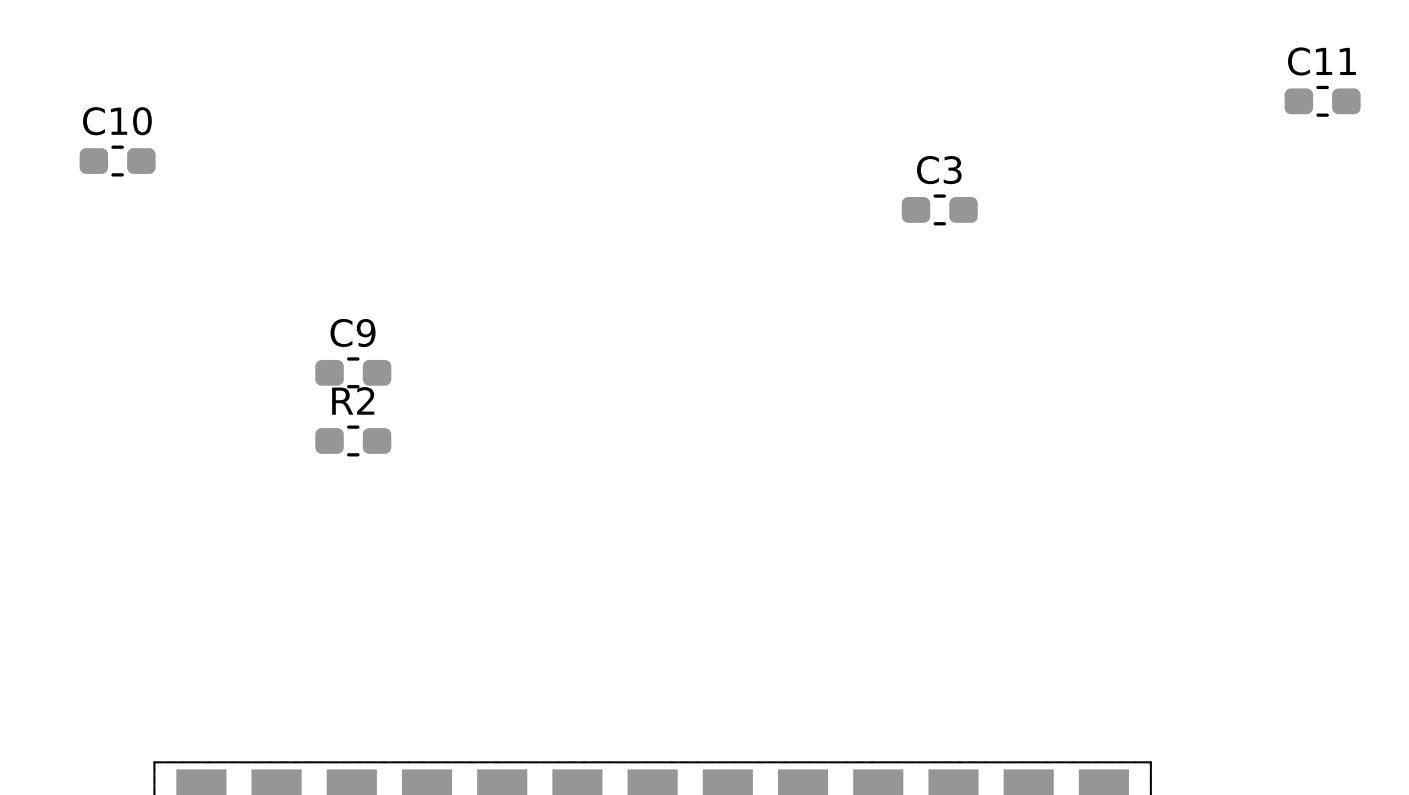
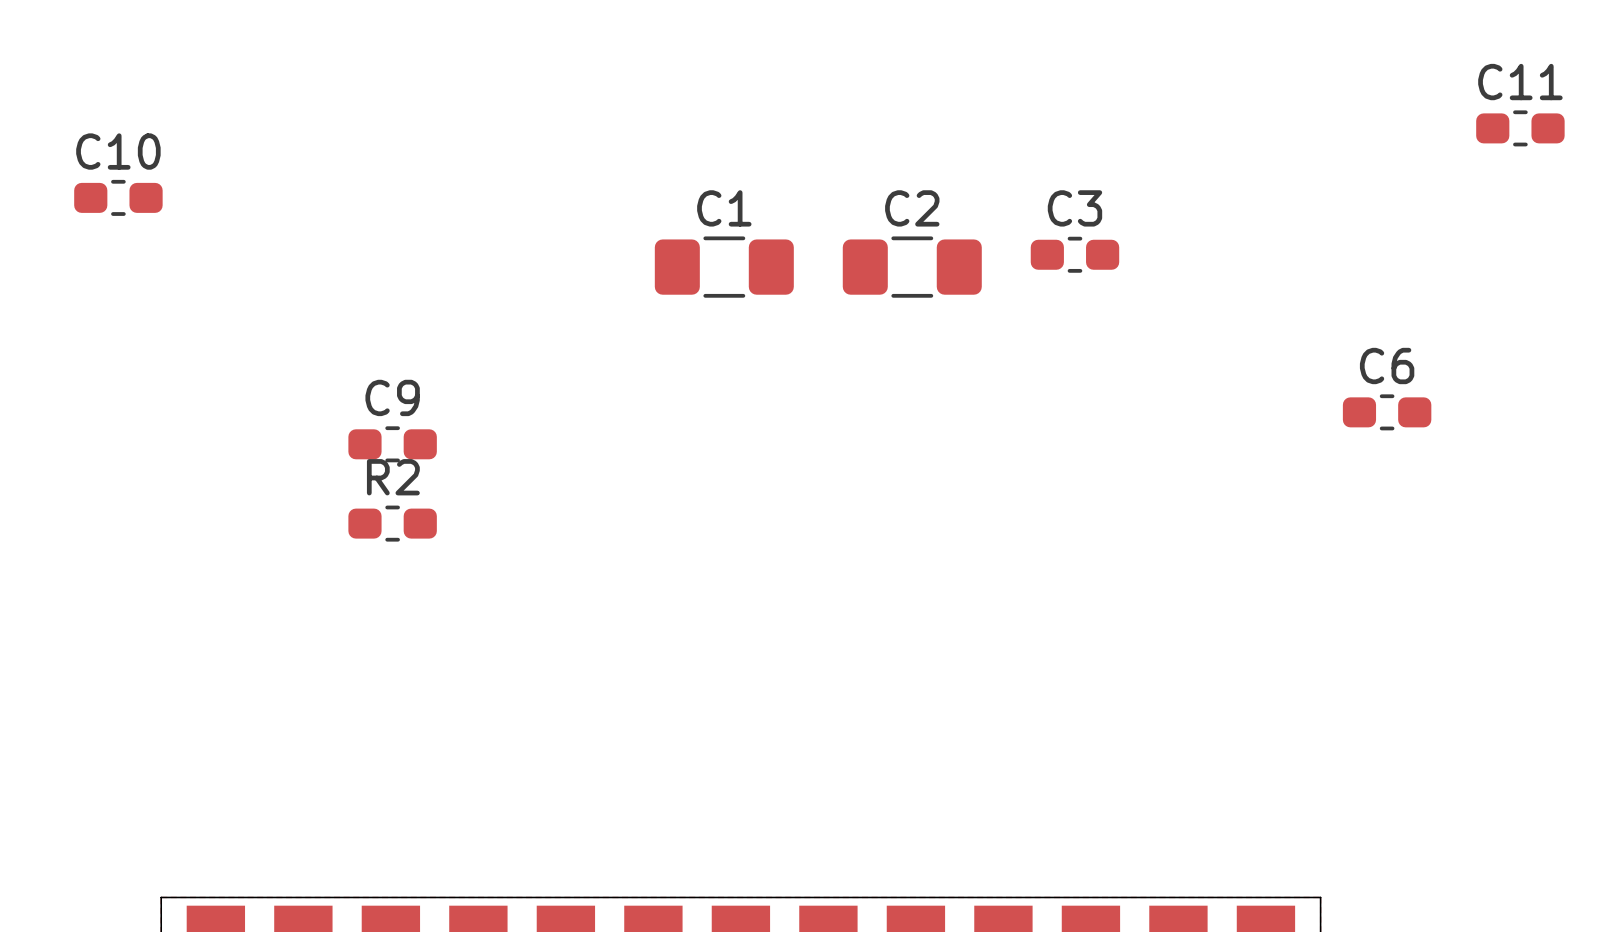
C1: none -> (724, 267)
C2: none -> (912, 267)
C6: none -> (1387, 412)

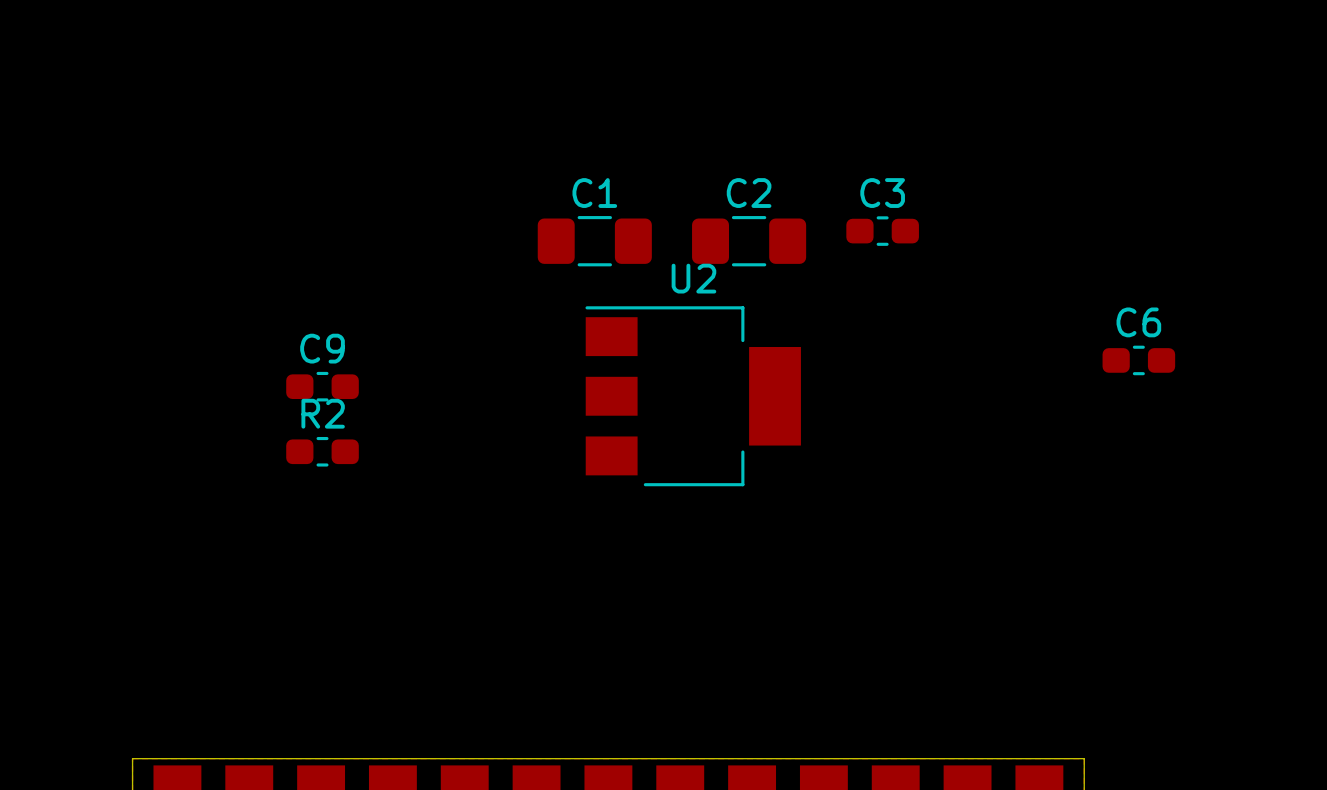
C11: (1520, 128) -> none
C10: (118, 197) -> none
U2: none -> (693, 396)

